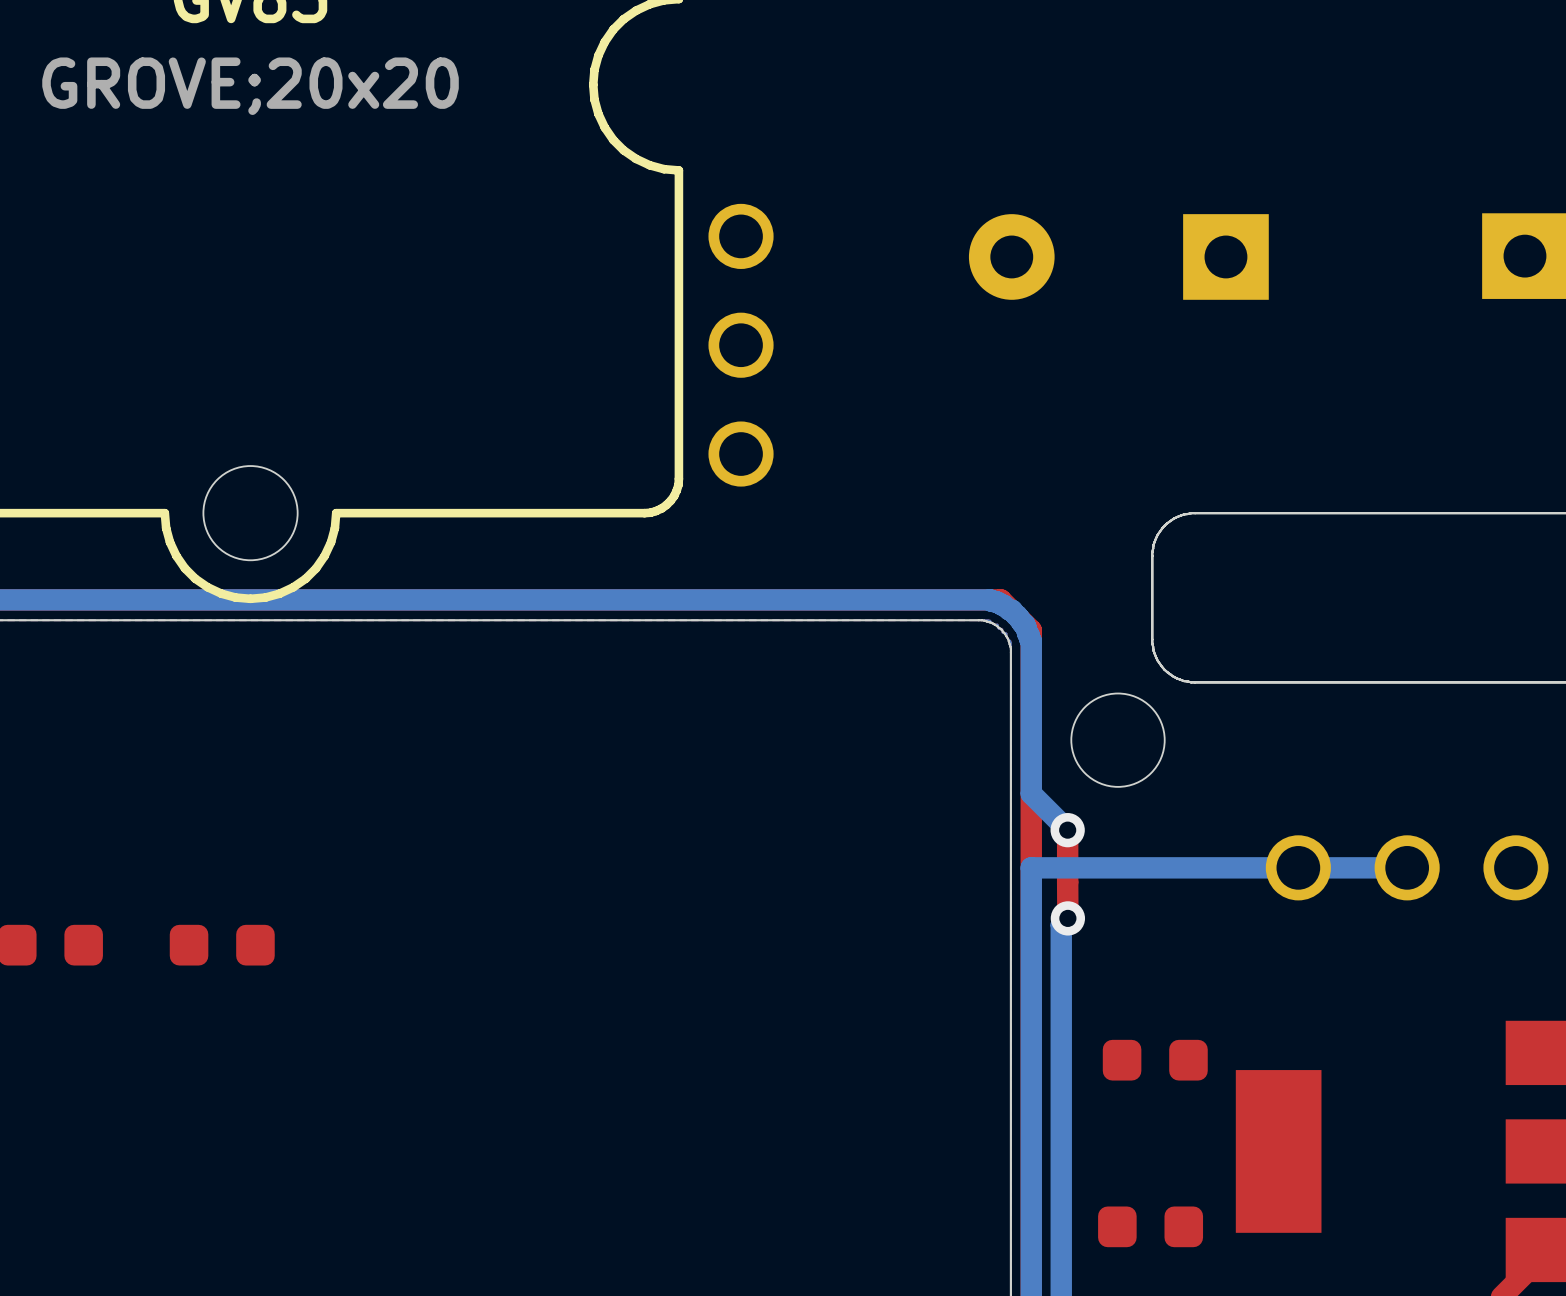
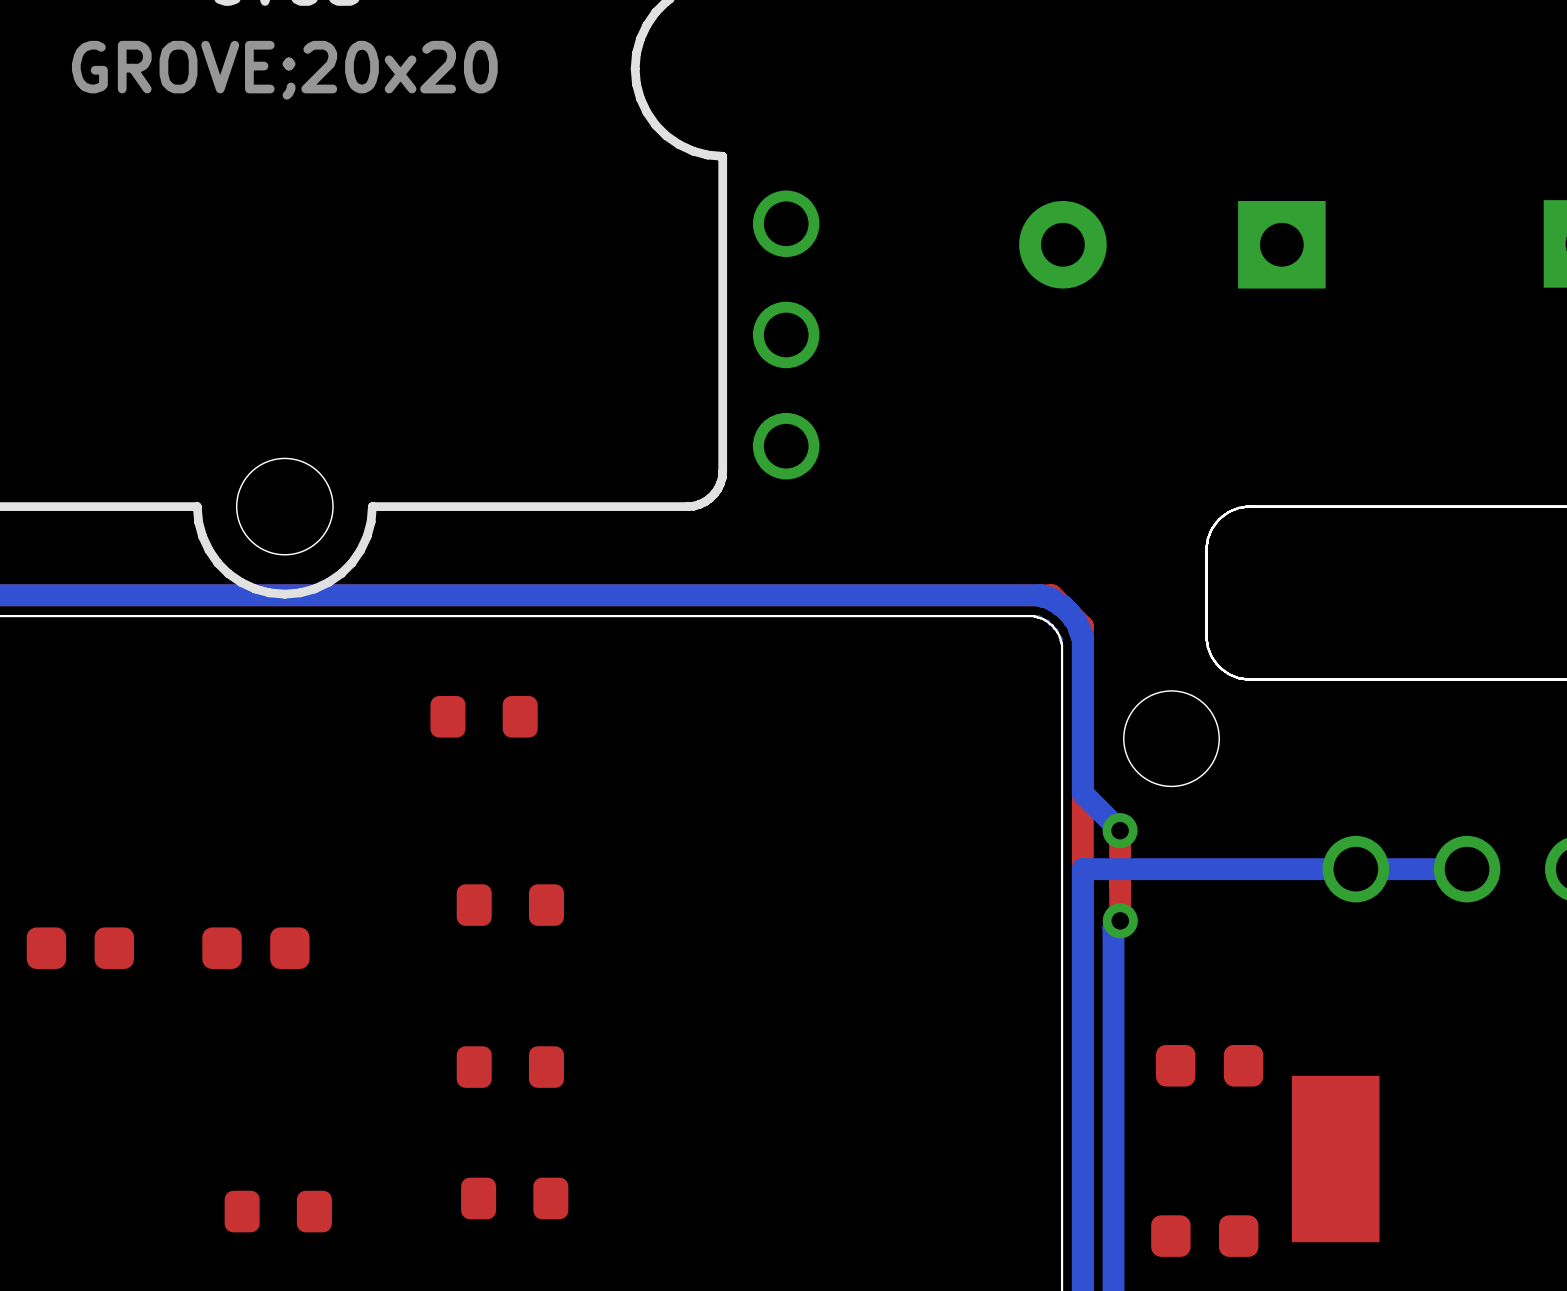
part: none -> (484, 716)
part: none -> (510, 905)
part: none -> (510, 1067)
part: none -> (514, 1198)
part: none -> (278, 1211)

